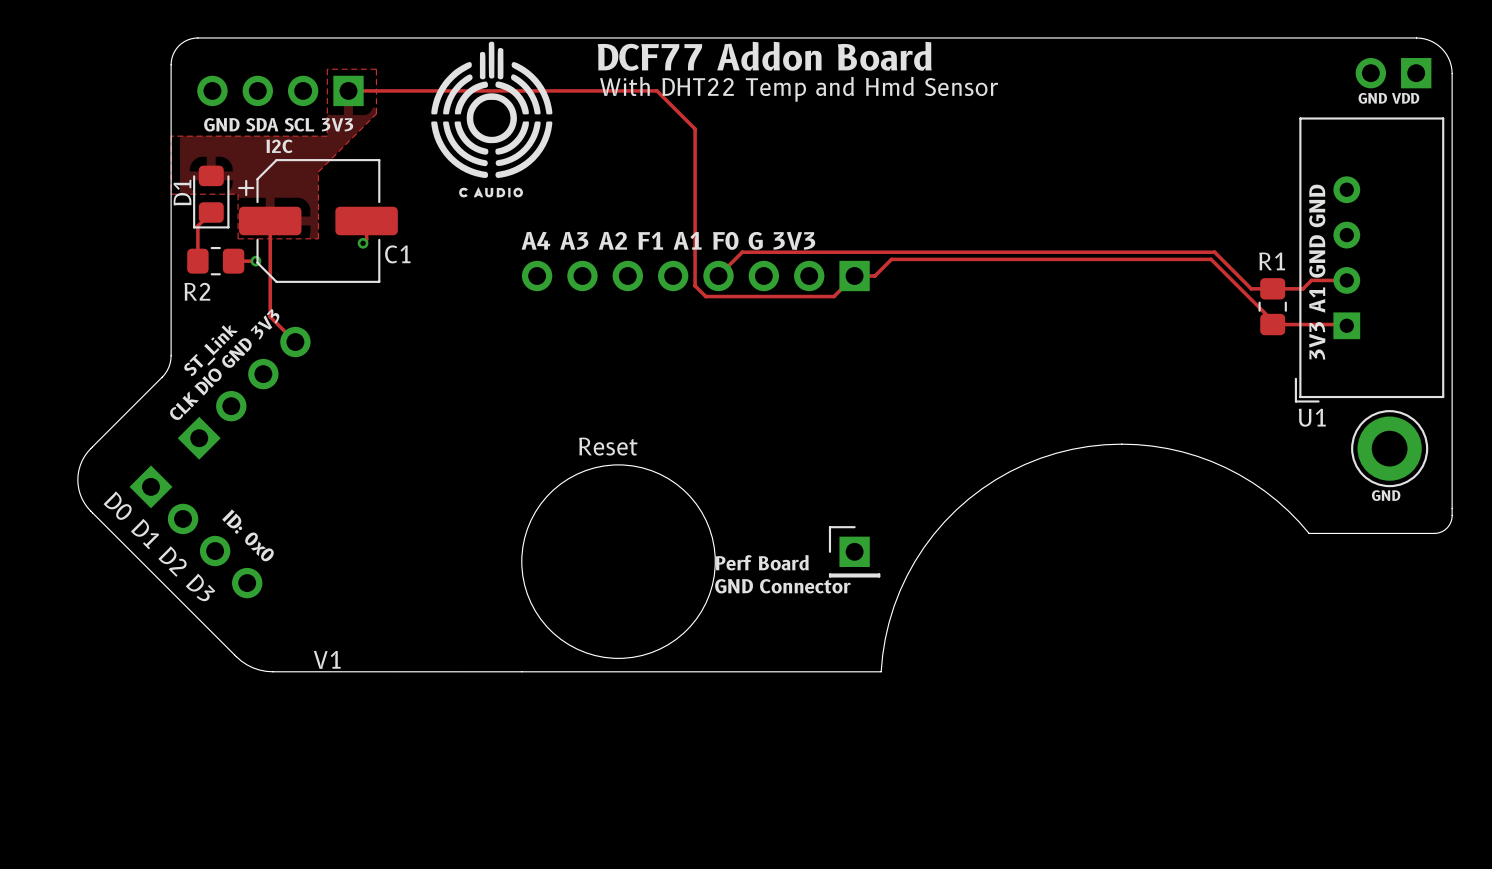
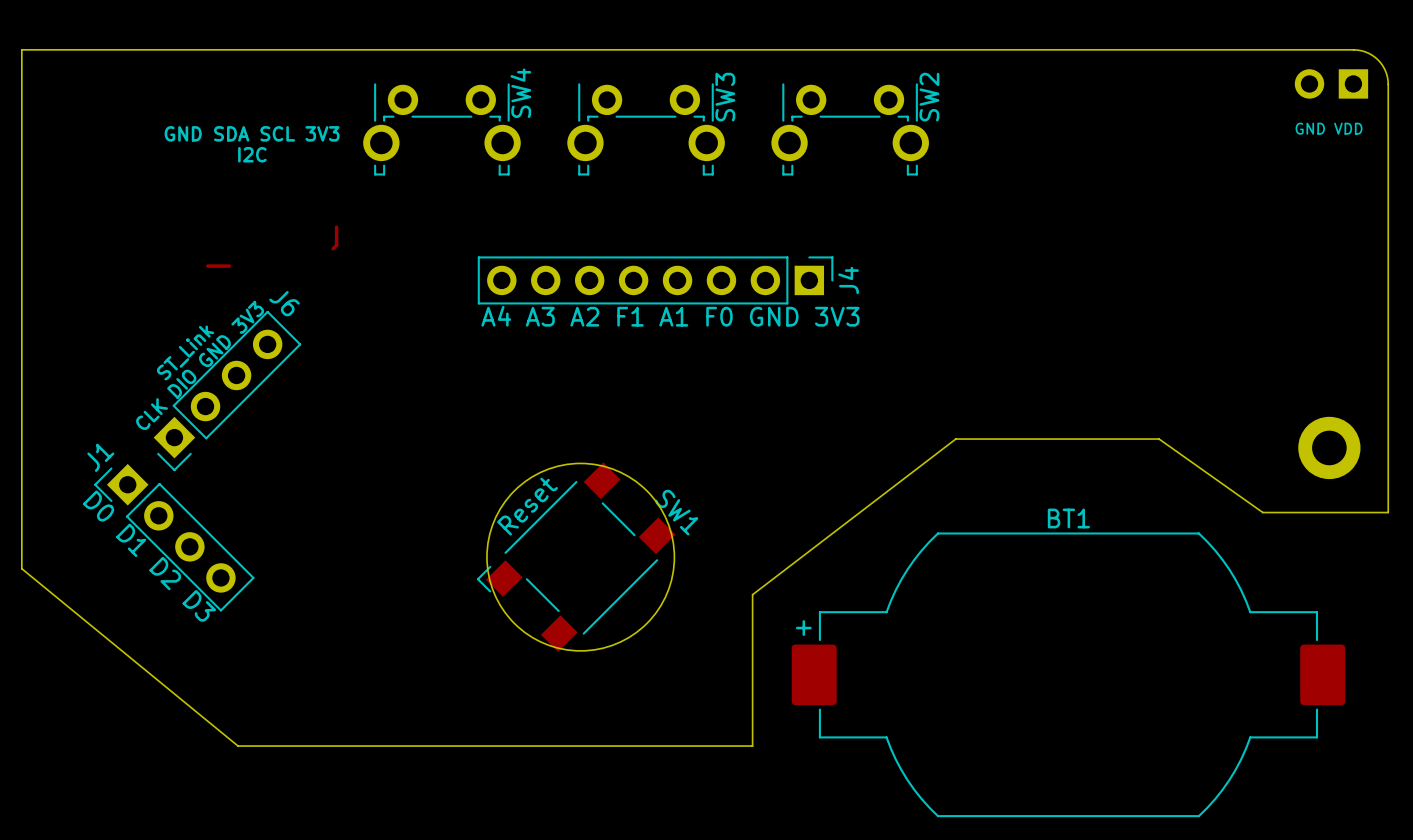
board edge: (197, 37) (181, 43) (174, 51) (171, 61) (170, 363) (162, 377) (87, 452) (80, 465) (78, 484) (82, 499) (90, 511) (236, 656) (253, 667) (272, 671) (881, 671) (885, 638) (899, 591) (923, 547) (944, 521) (968, 499) (1010, 471) (1056, 453) (1088, 446) (1121, 444) (1152, 446) (1182, 451) (1211, 461) (1239, 474) (1264, 491) (1288, 510) (1309, 533) (1436, 533) (1446, 528) (1452, 515) -> (173, 49) (21, 49) (21, 568) (238, 746) (752, 746) (752, 594) (955, 439) (1159, 439) (1262, 512) (1388, 512)
drawing: [431, 41, 553, 198] -> none
text: DCF77 Addon Board (764, 56) -> none
zone outline: (327, 69) (327, 136) (171, 136) (171, 194) (238, 194) (238, 238) (318, 238) (318, 171) (376, 113) (376, 69) (327, 69) -> none
text: With DHT22 Temp and Hmd Sensor (799, 89) -> none
part: (280, 90) -> none
track: (348, 90) (657, 90) (695, 129) (695, 285) (705, 296) (834, 296) (854, 275) (874, 275) (891, 259) (1211, 259) (1272, 320) (1272, 324) (1346, 325) -> none
text position: GND VDD (1388, 98) -> GND VDD (1329, 128)
SW4: none -> (441, 129)
SW3: none -> (646, 129)
SW2: none -> (850, 129)
D1: (211, 197) -> none
track: (211, 212) (197, 225) (197, 261) -> none
track: (270, 220) (270, 316) (295, 342) -> none
C1: (317, 220) -> none
text: A4 A3 A2 F1 A1 F0 G 3V3 (668, 240) -> none
via: (363, 243) -> none
U1: (1369, 259) -> none
R2: (215, 261) -> none
via: (255, 261) -> none
text: 3V3 A1 GND GND (1317, 272) -> none
part: (695, 275) -> none
J4: none -> (655, 280)
track: (718, 275) (742, 252) (1214, 252) (1251, 288) (1303, 288) (1311, 280) (1346, 280) -> none
R1: (1272, 306) -> none
text: none -> A4 A3 A2 F1 A1 F0 GND 3V3 (670, 316)
J6: none -> (227, 391)
part: (244, 393) -> none
part footprint: [1351, 410, 1429, 488] -> [1298, 416, 1361, 480]
text rotation: 0° (608, 446) -> 45° counterclockwise (527, 506)
text: GND (1386, 495) -> none
text: ID: 0x0 (247, 535) -> none
J1: none -> (174, 537)
part: (854, 551) -> none
SW1: none -> (576, 557)
text: Perf Board (762, 562) -> none
text: GND Connector (782, 586) -> none
text: V1 (327, 659) -> none
BT1: none -> (1068, 674)

